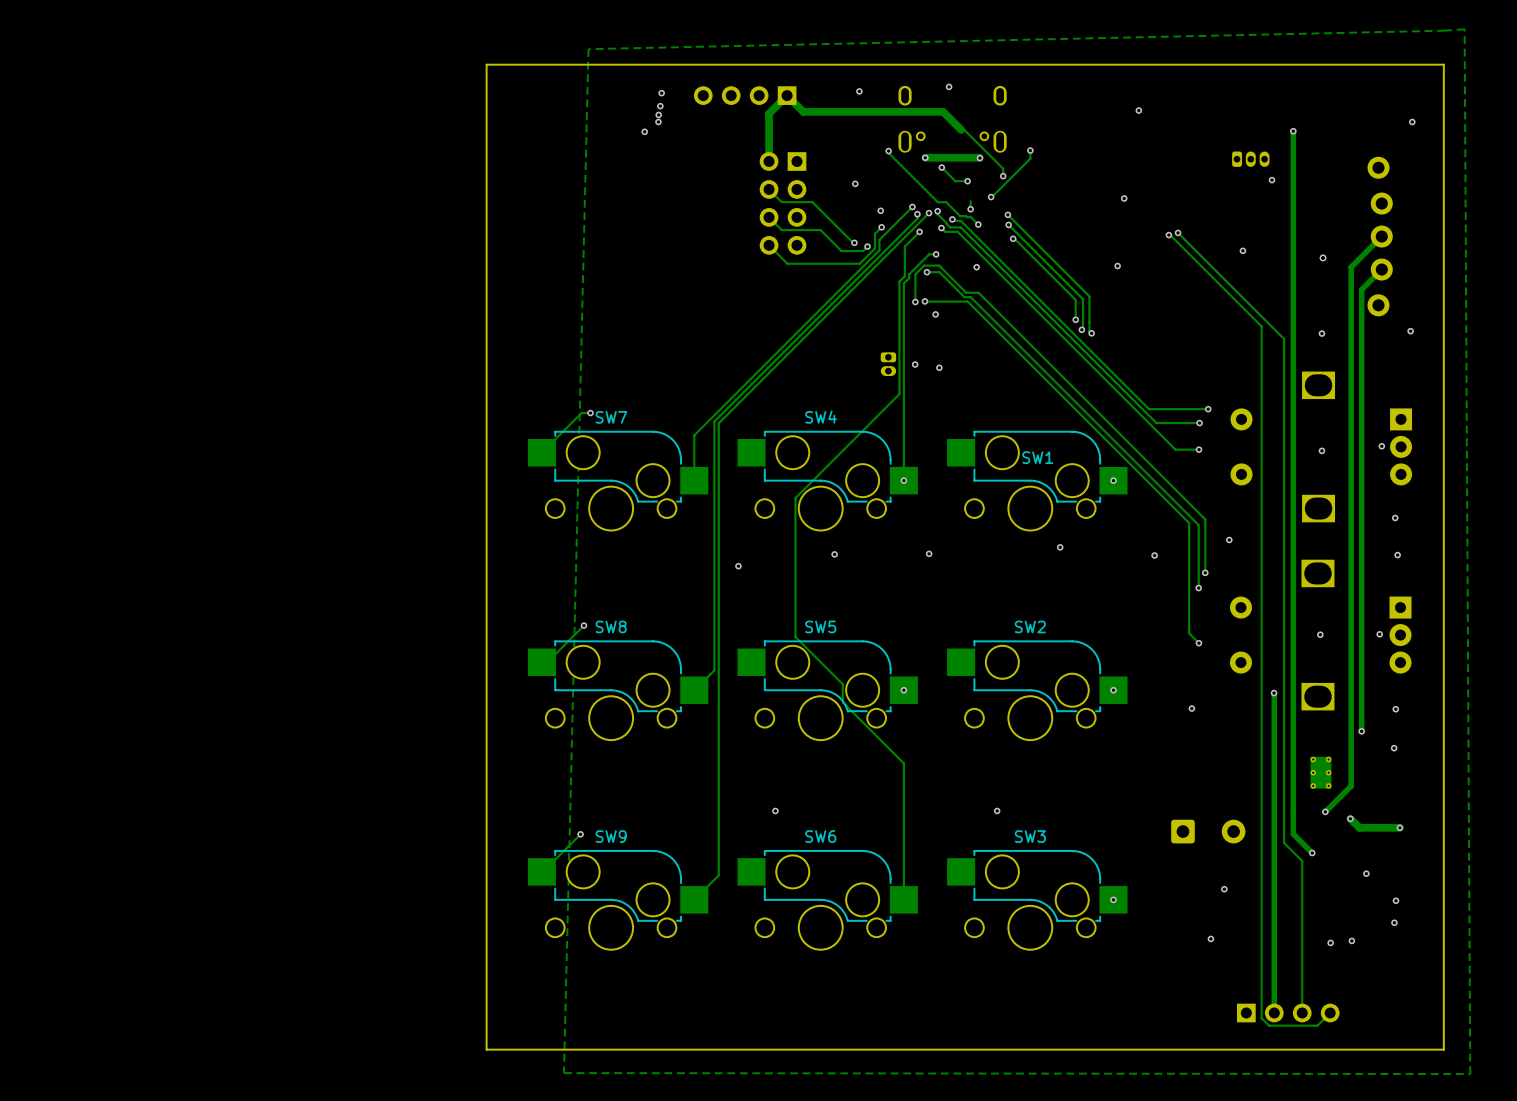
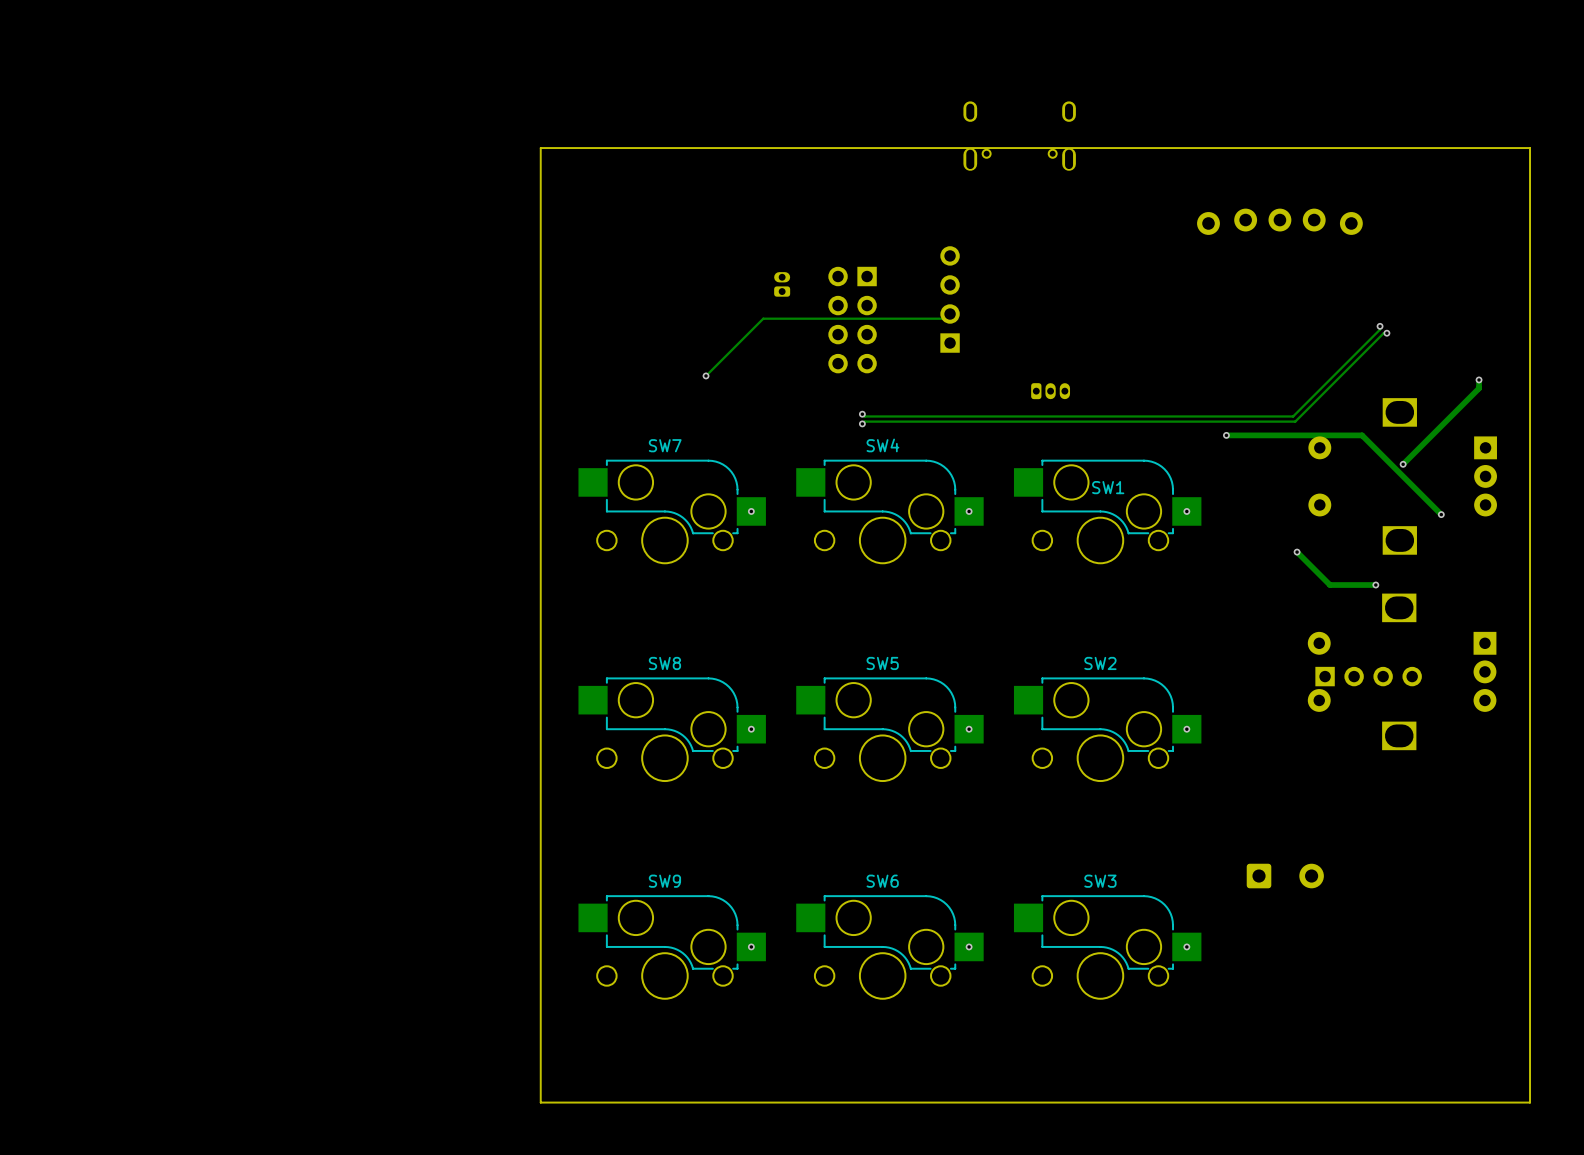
zone outline: (1464, 29) (1470, 1074) (563, 1073) (588, 49) (1464, 29) -> none
via: (949, 86) -> none
via: (859, 91) -> none
via: (661, 93) -> none
part rotation: 0° (745, 95) -> 90° clockwise (950, 299)
part position: (745, 95) -> (950, 299)
via: (660, 106) -> none
via: (1138, 110) -> none
via: (658, 114) -> none
via: (658, 122) -> none
via: (1412, 122) -> none
board edge: (1443, 130) (1443, 64) (486, 64) (486, 1049) (491, 1049) -> (1530, 148) (540, 148) (540, 1102)
via: (644, 131) -> none
track: (1293, 131) (1293, 834) (1312, 853) -> none
via: (1293, 131) -> none
track: (1030, 150) (1030, 158) (991, 197) -> none
via: (1030, 150) -> none
track: (888, 151) (937, 202) (946, 202) (960, 216) (970, 217) (978, 224) -> none
via: (888, 151) -> none
track: (925, 157) (979, 158) -> none
via: (925, 157) -> none
via: (979, 158) -> none
part: (1250, 159) -> none
track: (769, 161) (769, 113) (787, 95) (803, 111) (943, 111) (1003, 168) (1003, 176) -> none
track: (941, 167) (955, 181) (967, 181) -> none
via: (941, 167) -> none
via: (1003, 176) -> none
via: (1271, 180) -> none
via: (967, 181) -> none
via: (855, 183) -> none
track: (769, 189) (781, 202) (812, 202) (854, 242) -> none
via: (991, 197) -> none
via: (1124, 198) -> none
track: (970, 201) (970, 209) -> none
part position: (783, 203) -> (852, 320)
track: (912, 206) (879, 239) (879, 250) (694, 435) (694, 480) -> none
via: (912, 206) -> none
via: (970, 209) -> none
via: (880, 210) -> none
track: (937, 211) (937, 214) (950, 227) (960, 227) (1156, 423) (1199, 423) -> none
via: (937, 211) -> none
track: (929, 213) (718, 423) (718, 875) (694, 899) -> none
via: (929, 213) -> none
track: (917, 214) (917, 218) (714, 421) (714, 670) (694, 690) -> none
via: (917, 214) -> none
track: (1007, 214) (1089, 296) (1089, 331) (1091, 333) -> none
via: (1007, 214) -> none
track: (769, 217) (781, 230) (820, 230) (841, 251) (863, 251) (867, 246) -> none
track: (952, 219) (960, 220) (1149, 409) (1208, 409) -> none
via: (952, 219) -> none
via: (978, 224) -> none
track: (1008, 224) (1082, 299) (1081, 329) -> none
via: (1008, 224) -> none
track: (881, 227) (875, 233) (875, 248) (859, 263) (787, 263) (769, 245) -> none
via: (881, 227) -> none
track: (941, 228) (945, 231) (957, 231) (1175, 449) (1199, 449) -> none
via: (941, 228) -> none
track: (919, 231) (904, 246) (904, 276) (899, 281) (899, 394) (795, 498) (795, 636) (842, 684) (842, 702) (903, 763) (903, 899) -> none
via: (919, 231) -> none
track: (1178, 232) (1284, 338) (1284, 842) (1302, 861) (1302, 1013) -> none
via: (1178, 232) -> none
track: (1168, 235) (1261, 326) (1261, 1018) (1269, 1025) (1317, 1025) (1330, 1013) -> none
via: (1168, 235) -> none
part rotation: 0° (1380, 236) -> 90° counterclockwise (1279, 221)
part position: (1380, 236) -> (1279, 221)
track: (1381, 236) (1351, 267) (1351, 786) (1325, 811) -> none
track: (1013, 238) (1075, 299) (1075, 319) -> none
via: (1013, 238) -> none
via: (854, 242) -> none
via: (867, 246) -> none
via: (1242, 250) -> none
track: (936, 254) (929, 254) (909, 274) (909, 278) (903, 283) (903, 480) -> none
via: (936, 254) -> none
via: (1323, 257) -> none
via: (1117, 266) -> none
via: (976, 267) -> none
track: (1381, 269) (1361, 289) (1361, 731) -> none
track: (926, 272) (939, 272) (964, 297) (970, 297) (1198, 525) (1198, 588) -> none
via: (926, 272) -> none
track: none -> (950, 314) (945, 318) (763, 318) (706, 375)
via: (924, 301) -> none
track: (925, 301) (967, 301) (1189, 522) (1189, 633) (1198, 643) -> none
track: (915, 302) (915, 274) (924, 265) (939, 265) (966, 292) (978, 292) (1205, 519) (1205, 572) -> none
via: (915, 302) -> none
track: none -> (1380, 326) (1380, 329) (1293, 416) (864, 416) (862, 414)
via: none -> (1380, 326)
track: none -> (1386, 333) (1383, 333) (1295, 421) (864, 421) (862, 423)
via: none -> (1386, 333)
via: (935, 314) -> none
via: (1075, 319) -> none
via: (1081, 329) -> none
via position: (1410, 331) -> (1479, 379)
via: (1091, 333) -> none
via: (1321, 333) -> none
via: none -> (706, 375)
track: none -> (1479, 379) (1479, 388) (1403, 464)
part rotation: 0° (888, 364) -> 180° (782, 284)
part position: (888, 364) -> (782, 284)
via: (915, 364) -> none
part: none -> (1050, 391)
via: (939, 367) -> none
via: none -> (862, 414)
via: none -> (862, 423)
track: none -> (1226, 435) (1362, 435) (1441, 514)
via: none -> (1226, 435)
via: (1208, 409) -> none
track: (590, 413) (581, 413) (541, 452) -> none
via: (590, 413) -> none
via: (1199, 423) -> none
via: (1381, 446) -> none
via: (1199, 449) -> none
via position: (1321, 450) -> (1403, 464)
via: none -> (751, 511)
via: none -> (1441, 514)
via: (1395, 517) -> none
track: none -> (1297, 552) (1329, 585) (1375, 585)
via position: (1229, 540) -> (1297, 552)
via: (1060, 547) -> none
via: none -> (1375, 585)
via: (929, 553) -> none
via: (834, 554) -> none
via: (1154, 555) -> none
via: (1397, 555) -> none
via: (738, 566) -> none
via: (1205, 572) -> none
via: (1198, 588) -> none
track: (583, 625) (547, 662) (541, 662) -> none
via: (583, 625) -> none
via: (1320, 634) -> none
via: (1379, 634) -> none
part: none -> (1368, 676)
via: (1198, 643) -> none
via: none -> (751, 729)
track: (1274, 693) (1274, 1013) -> none
via: (1274, 693) -> none
via: (1191, 708) -> none
via: (1395, 709) -> none
via: (1361, 731) -> none
via: (1394, 748) -> none
part: (1320, 772) -> none
via: (775, 810) -> none
via: (997, 810) -> none
via: (1325, 811) -> none
track: (1350, 818) (1359, 827) (1399, 827) -> none
via: (1350, 818) -> none
via: (1399, 827) -> none
track: (580, 834) (541, 871) -> none
via: (580, 834) -> none
via: (1312, 853) -> none
via: (1366, 873) -> none
via: (1224, 889) -> none
via: none -> (751, 946)
via: none -> (969, 946)
via: (1395, 900) -> none
via: (1394, 922) -> none
via: (1210, 938) -> none
via: (1351, 940) -> none
via: (1330, 942) -> none
part: (1288, 1013) -> none

